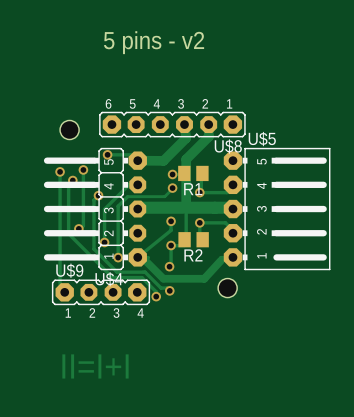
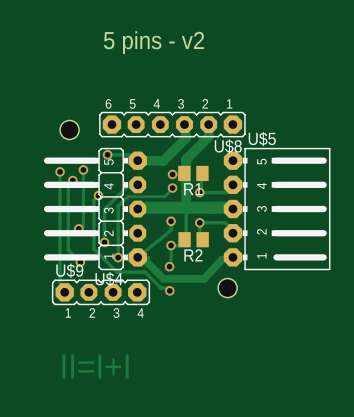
track: (72, 180) (68, 184) (68, 233) (112, 277) (141, 277) (156, 291) (156, 296) -> (72, 180) (68, 186) (68, 250) (80, 262)
via: none -> (80, 262)
via: (156, 296) -> none

